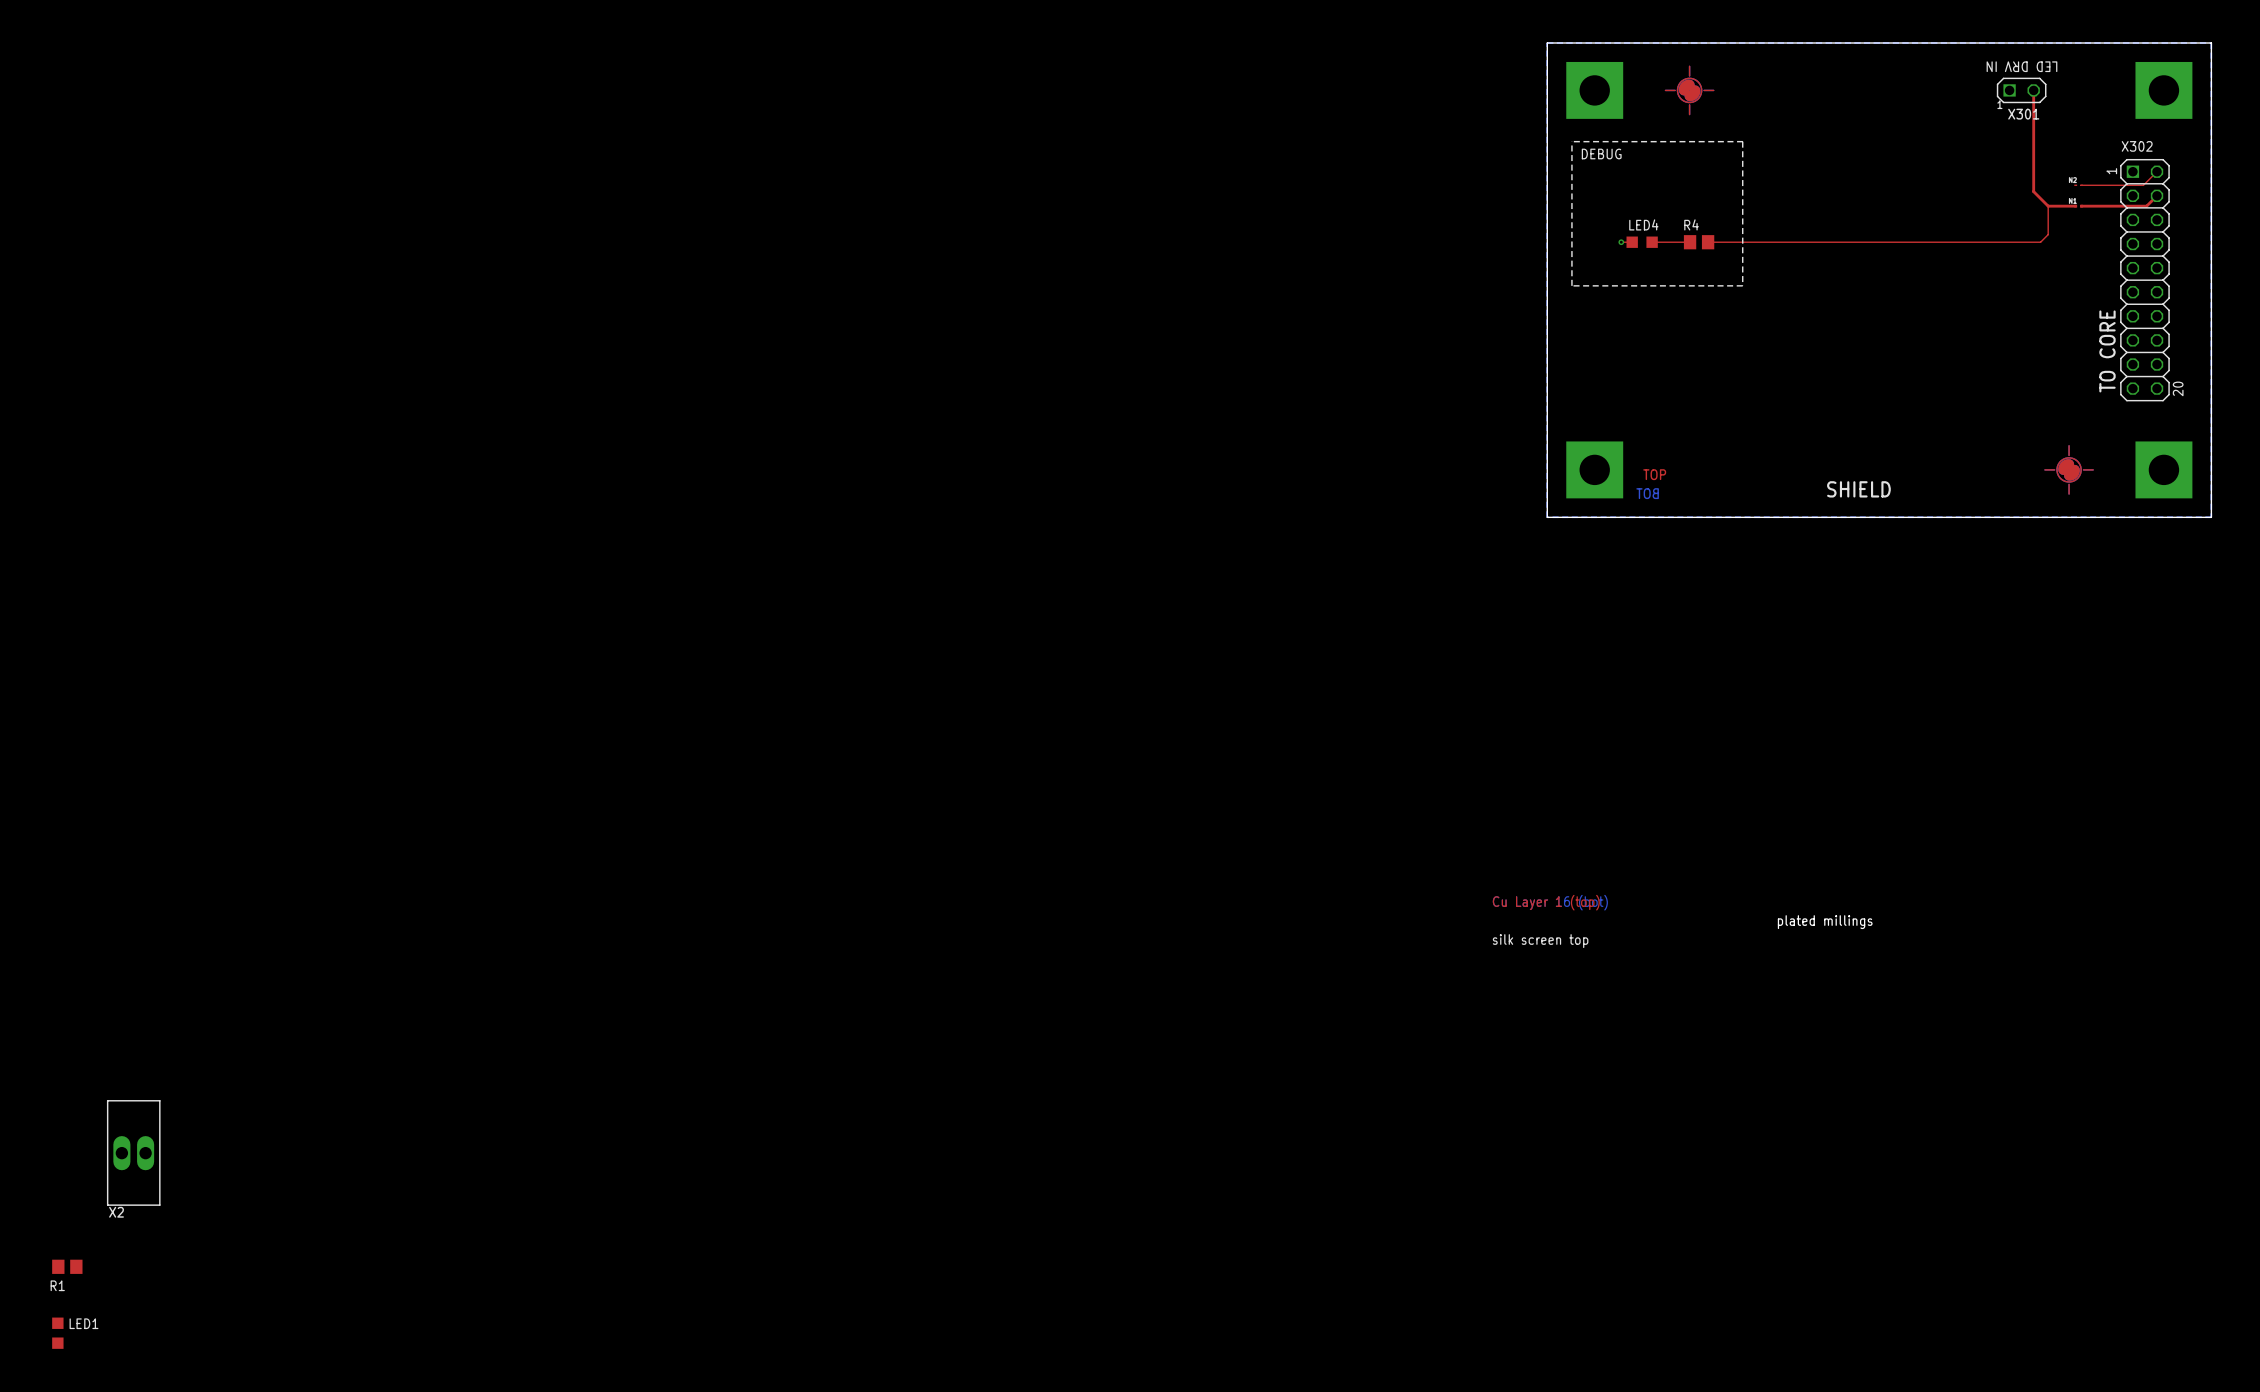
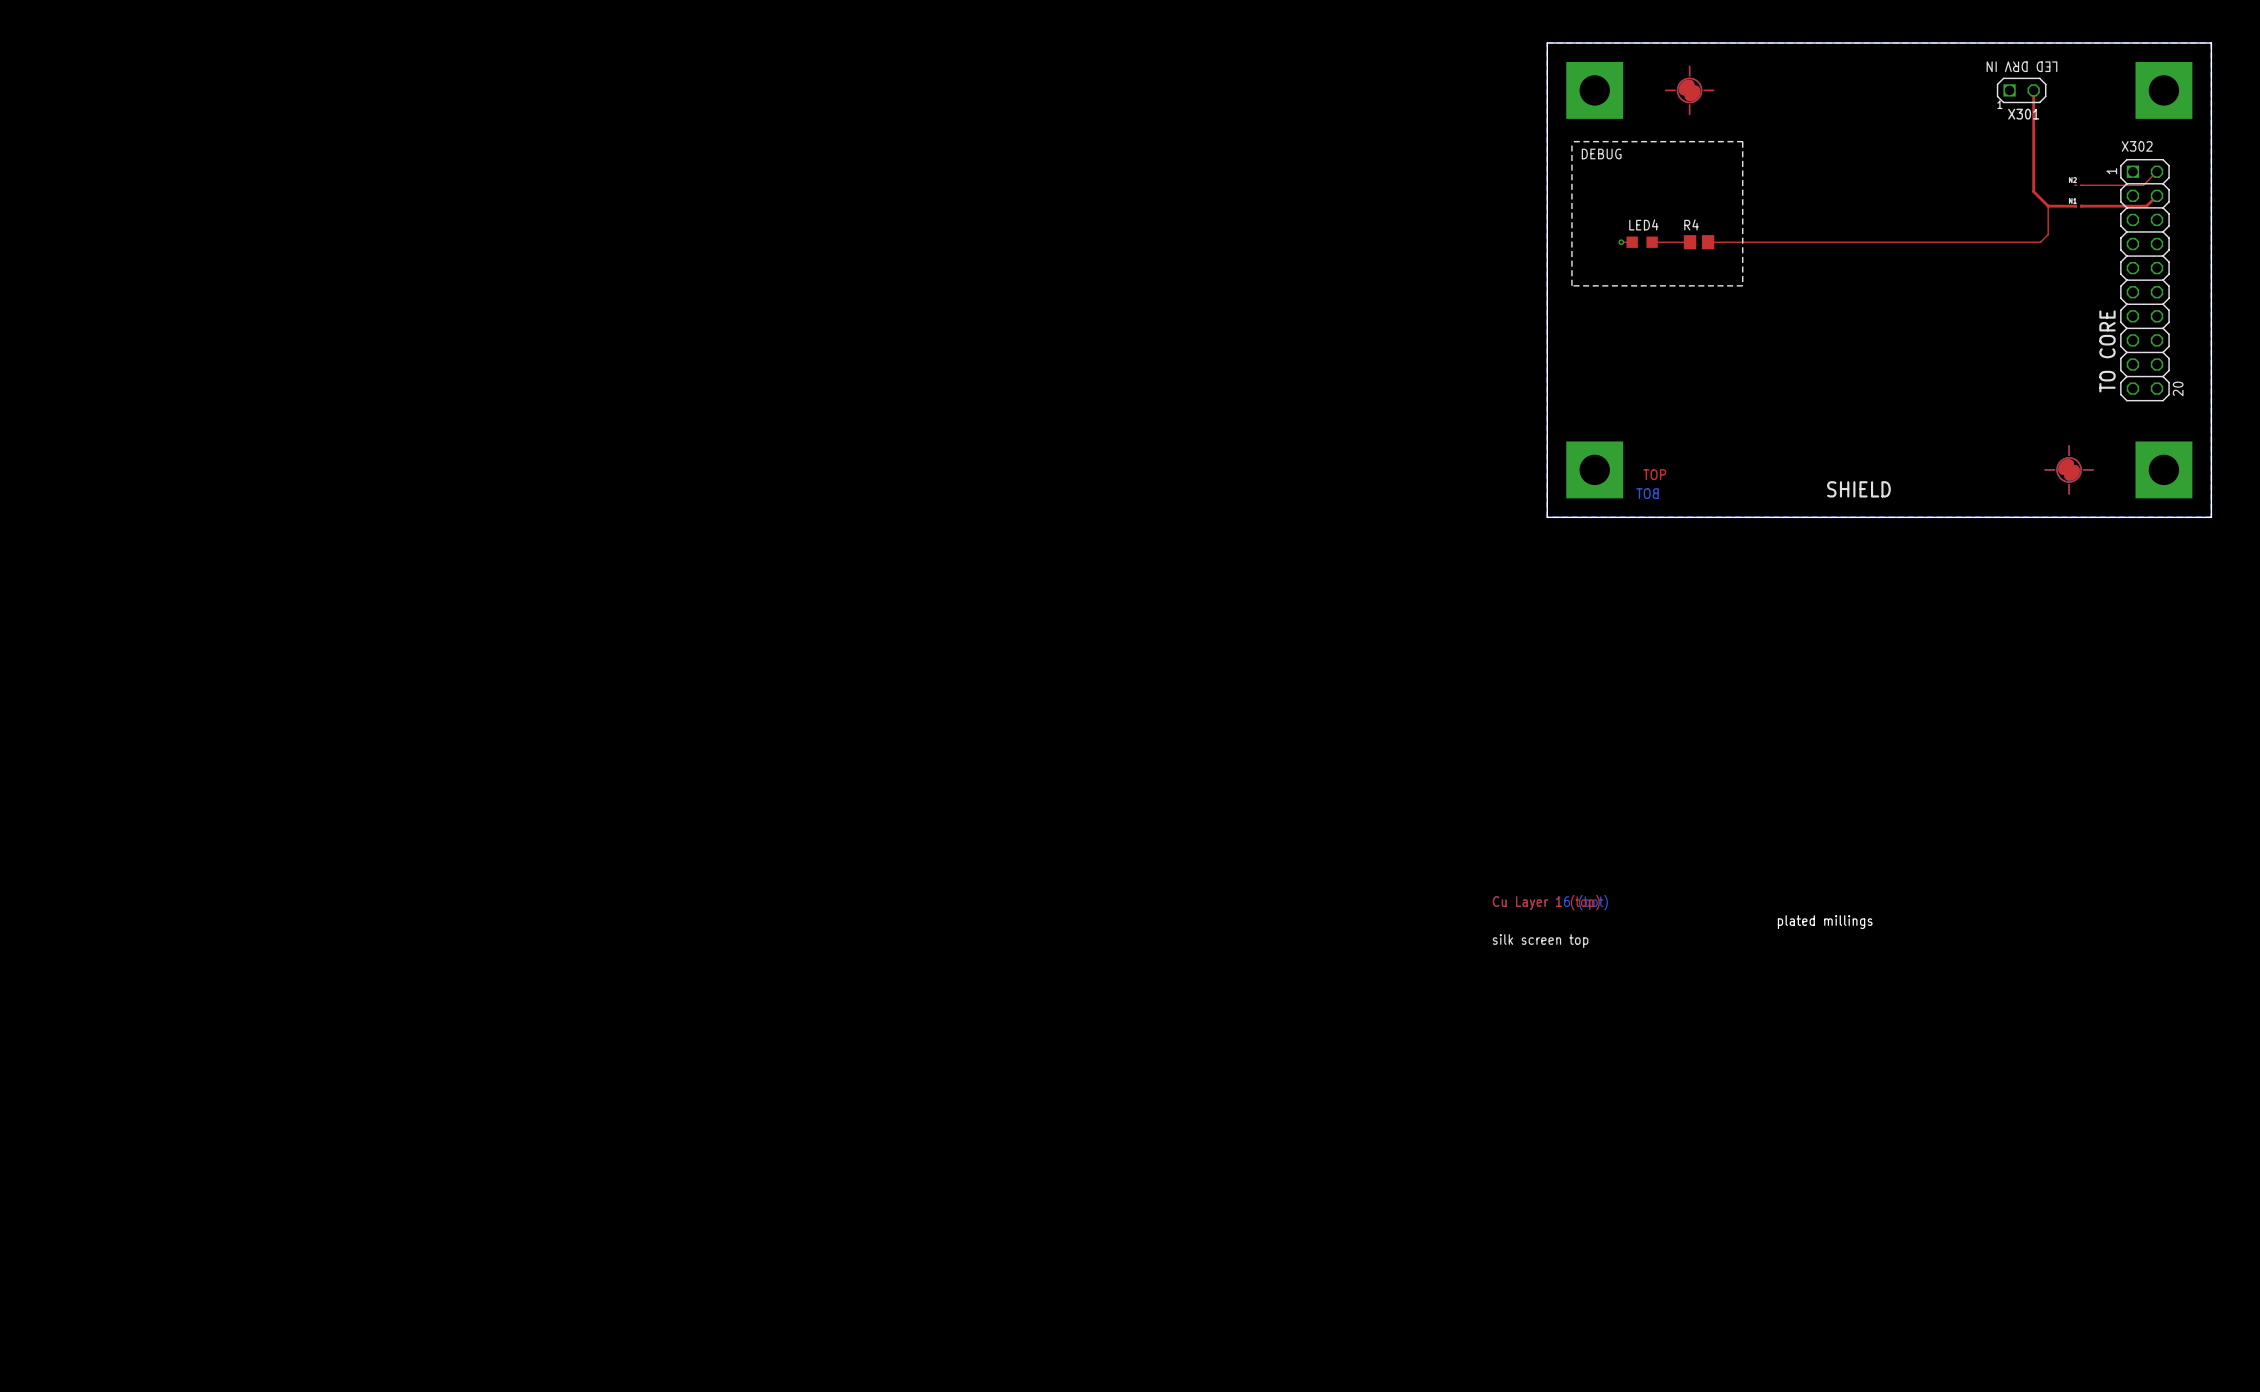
X2: (133, 1152) -> none
R1: (67, 1266) -> none
LED1: (57, 1333) -> none

